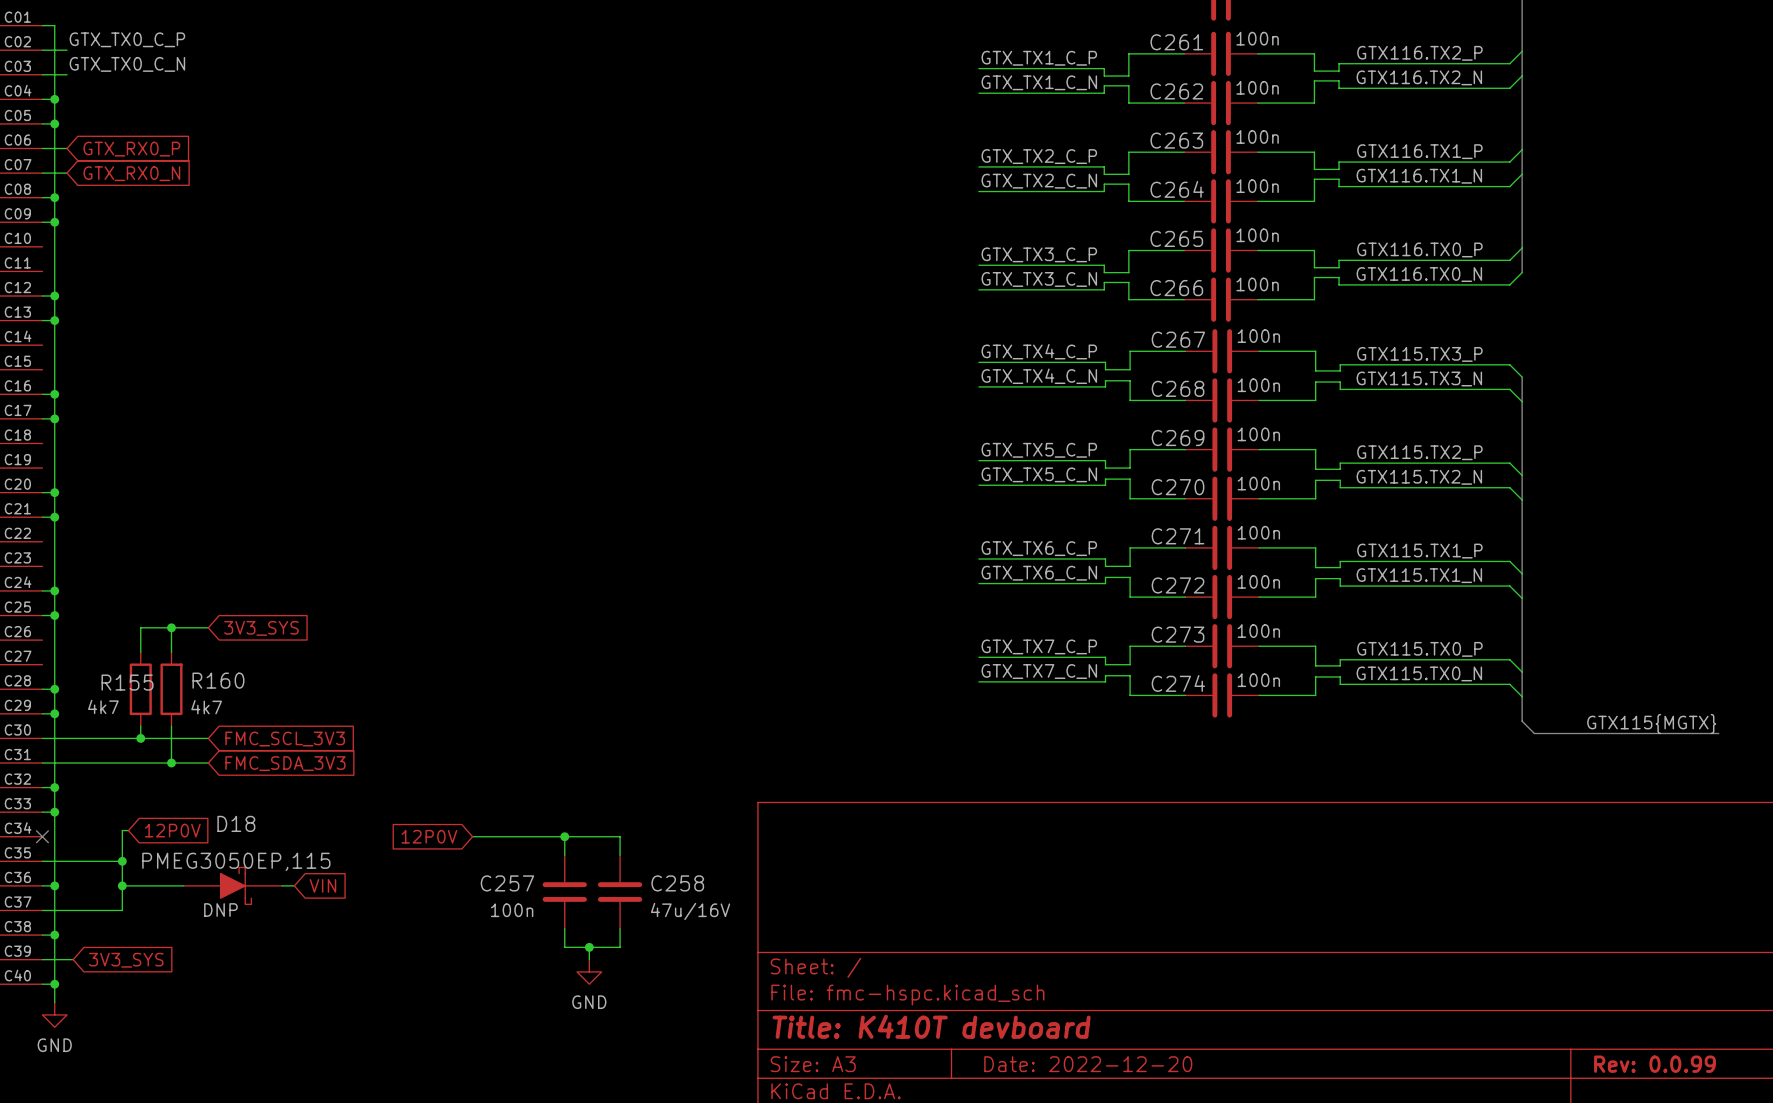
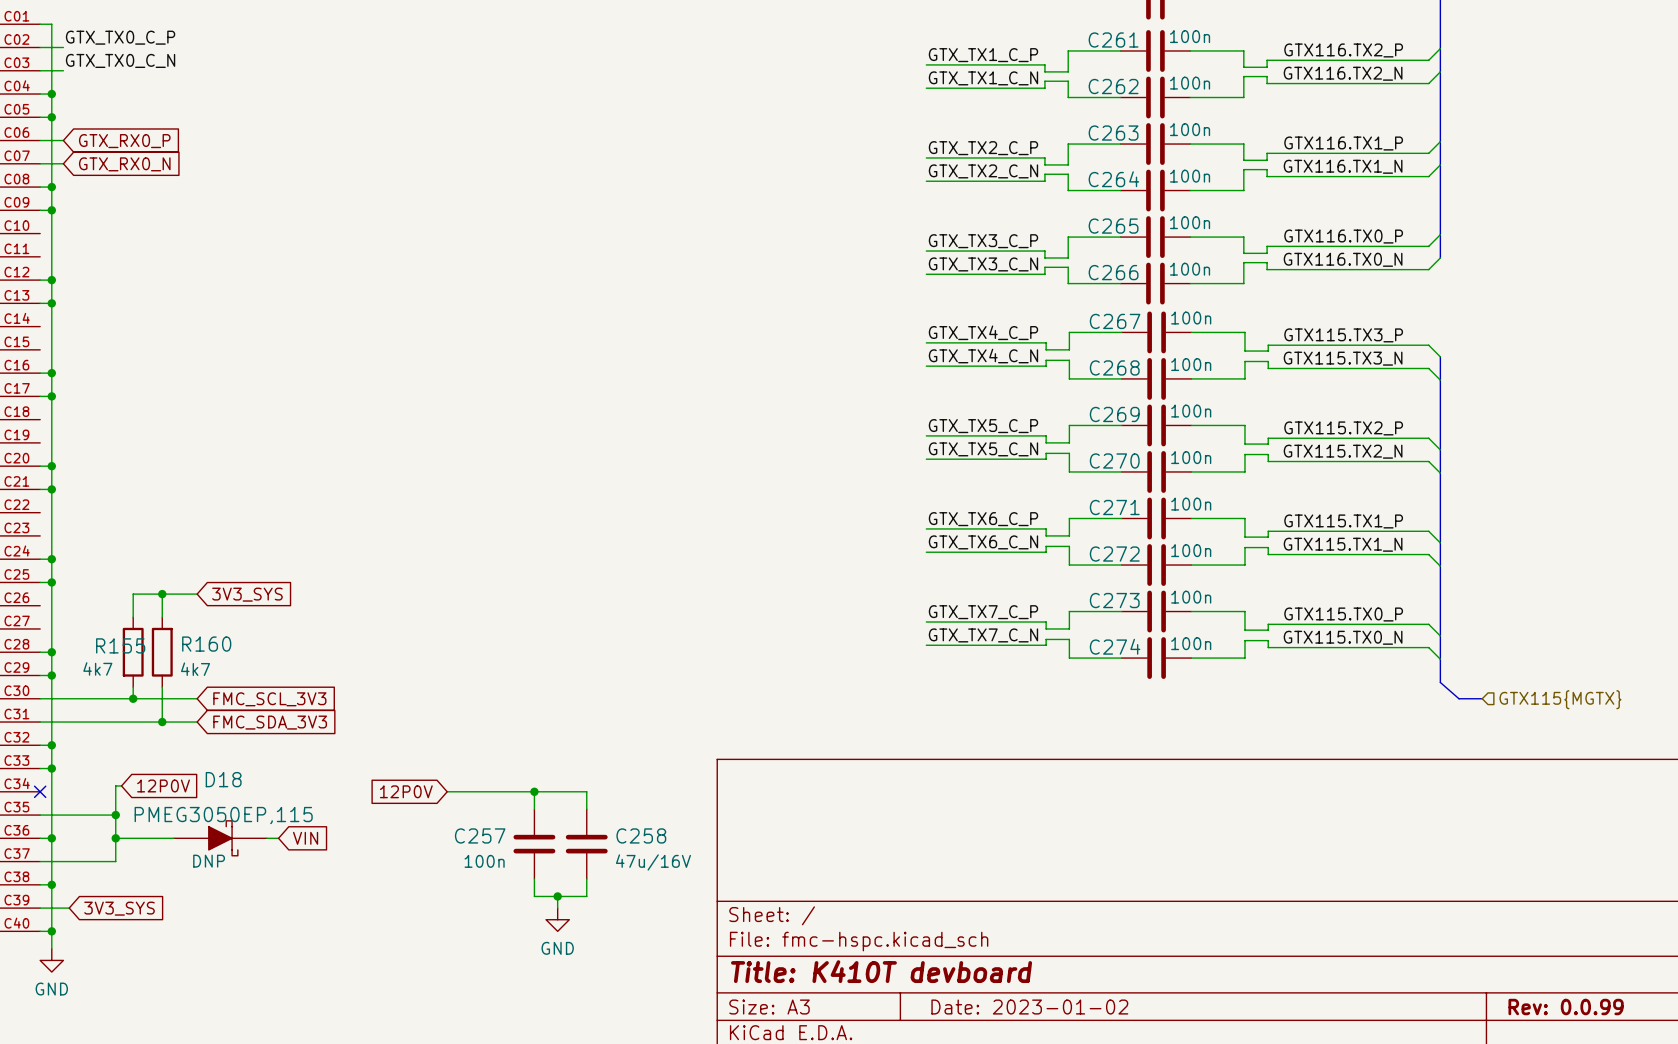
bus: (1522, 721) (1534, 733) (1718, 733) -> (1440, 682) (1458, 698) (1482, 698)
label: GTX115{MGTX} (1651, 724) -> none
hierarchical label: none -> GTX115{MGTX} (1560, 699)
title block: Date: 2022-12-20 (1088, 1064) -> Date: 2023-01-02 (1029, 1007)

